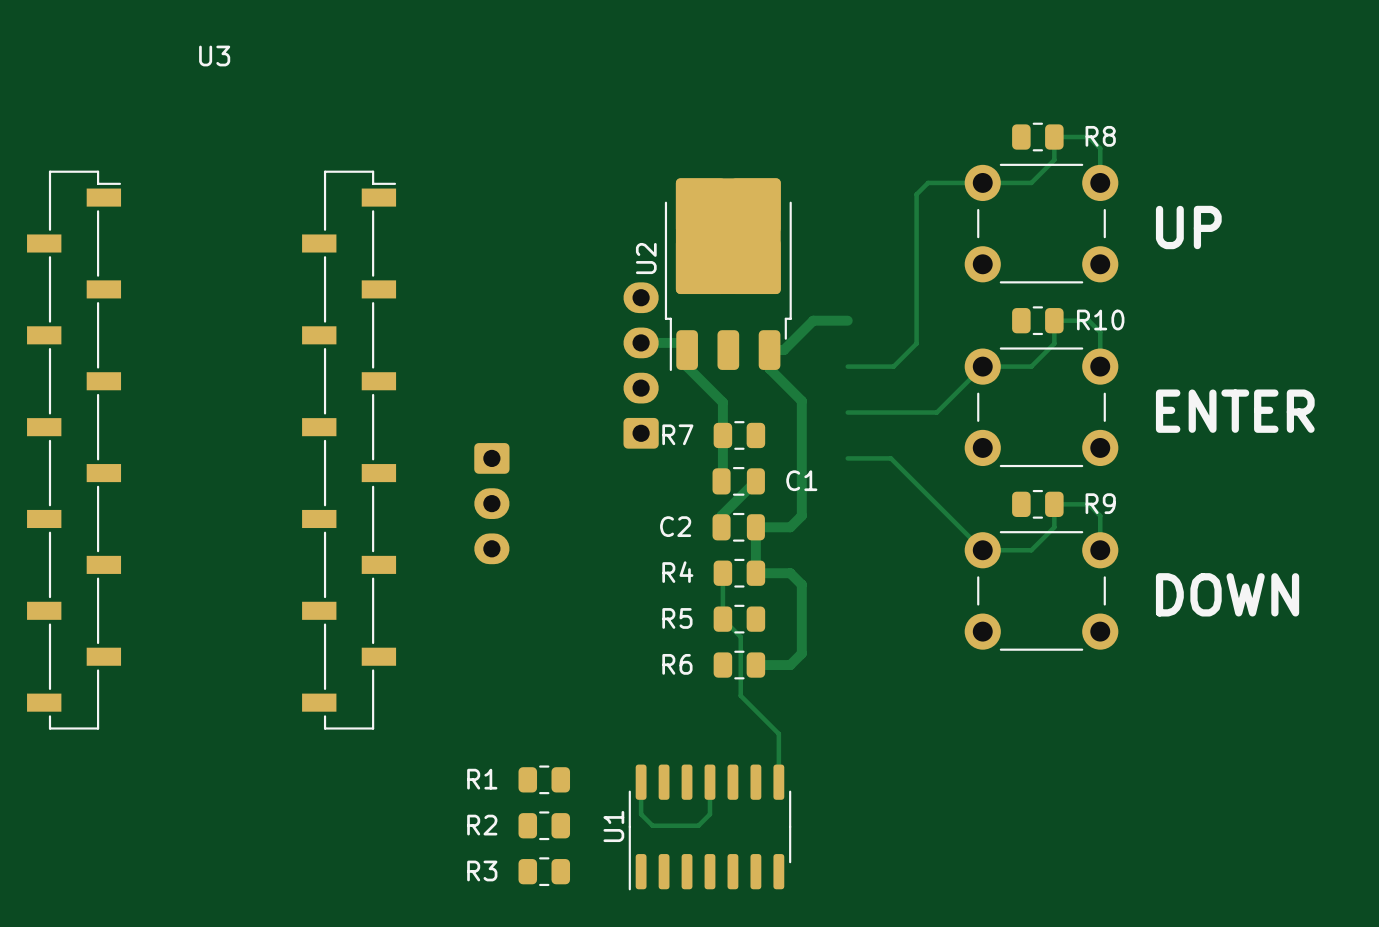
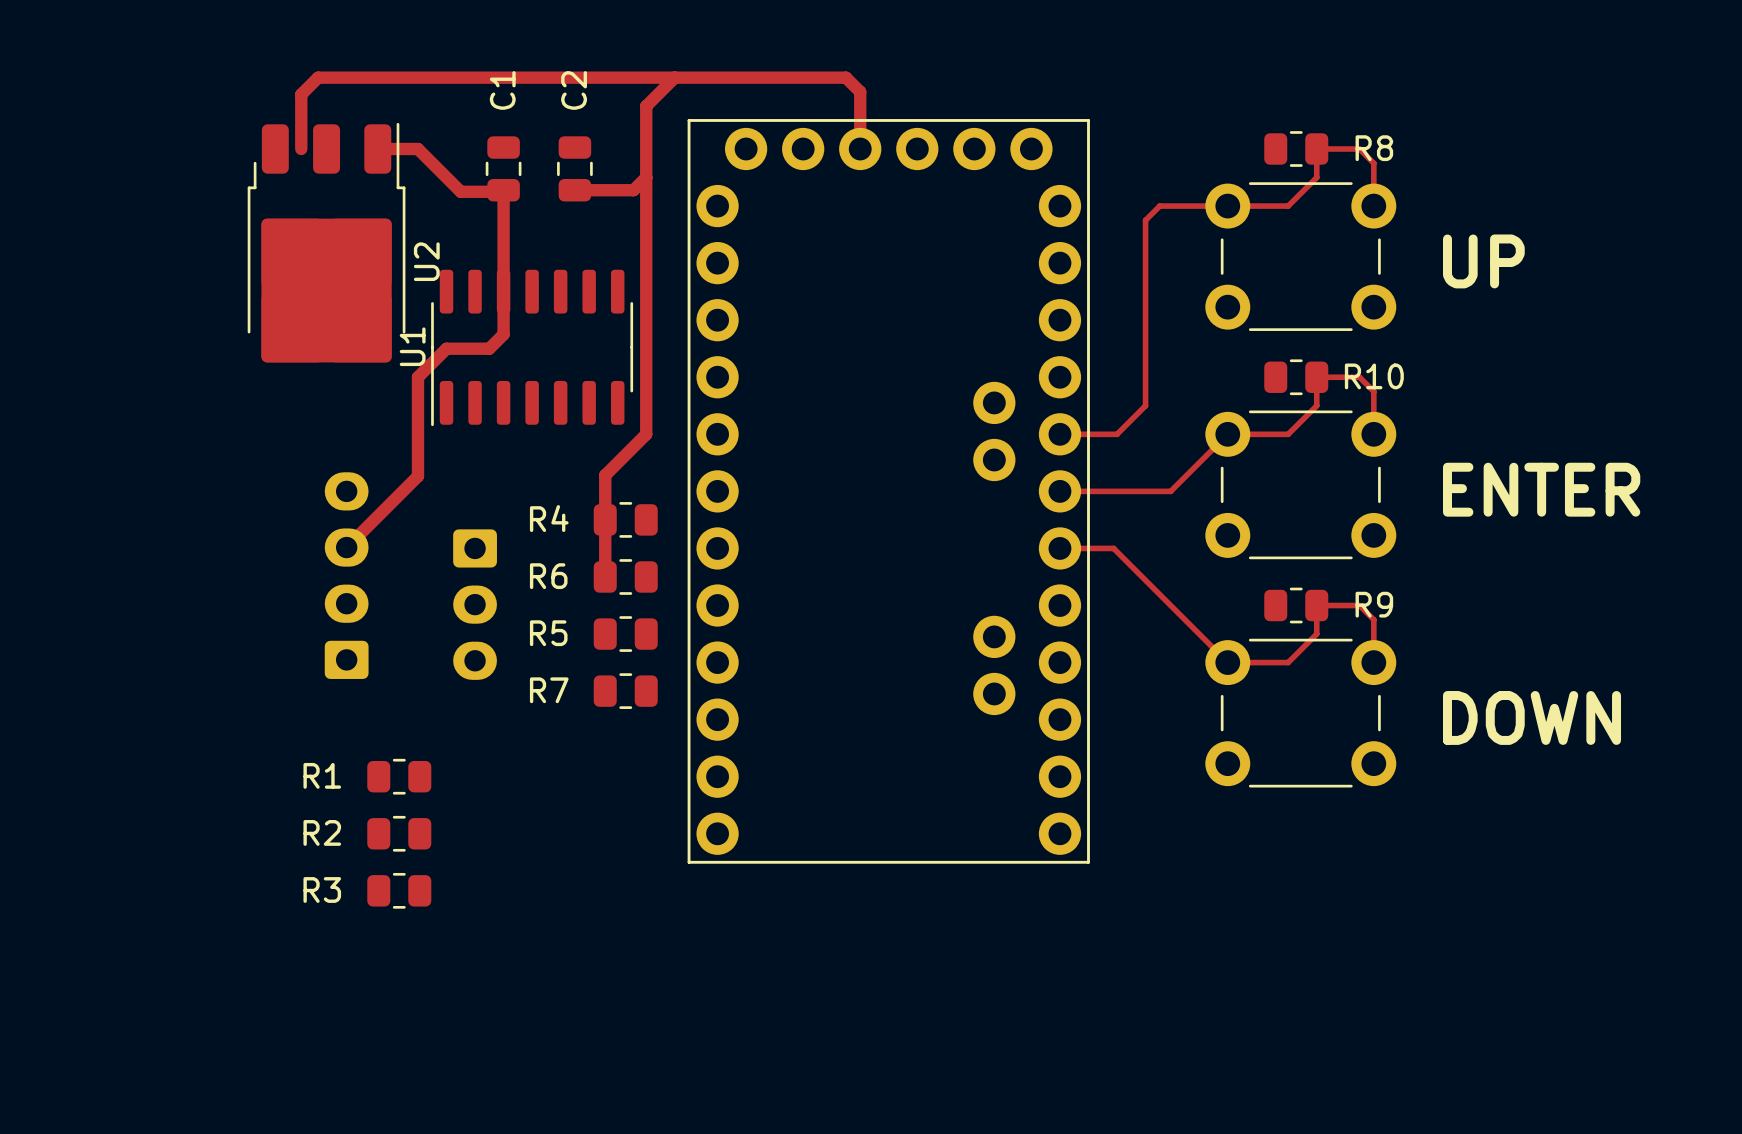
track: none -> (674, 77) (646, 106) (646, 434) (605, 475) (605, 576)
track: none -> (301, 149) (301, 94) (318, 77) (845, 77) (860, 91) (860, 149)
track: none -> (377, 149) (417, 149) (460, 191) (502, 191) (503, 190) (503, 334) (489, 348) (446, 348) (417, 377) (417, 476) (346, 547)
track: none -> (646, 177) (633, 190) (574, 190)
U2 rotation: 0° (728, 274) -> 180° (326, 242)
U2 position: (728, 274) -> (326, 242)
track: (847, 320) (813, 320) (783, 350) (769, 350) (769, 368) (801, 401) (801, 515) (790, 527) (755, 527) (755, 573) (790, 573) (801, 584) (801, 653) (790, 665) (755, 665) -> none
track: (641, 342) (679, 342) (687, 350) (687, 366) (722, 402) (721, 481) -> none
part position: (641, 365) -> (346, 575)
part: none -> (888, 491)
R7 position: (739, 435) -> (625, 691)
U3: (211, 450) -> none
C1 name position: C1 (801, 480) -> C1 (502, 90)
C1 rotation: 0° (738, 481) -> 90° clockwise (503, 168)
C1 position: (738, 481) -> (503, 168)
track: (755, 481) (721, 515) (721, 527) -> none
part position: (491, 503) -> (475, 604)
C2 rotation: 0° (738, 527) -> 90° clockwise (574, 168)
C2 position: (738, 527) -> (574, 168)
track: (722, 573) (722, 619) (740, 636) (740, 695) (778, 733) (778, 782) -> none
R4 position: (739, 573) -> (625, 519)
R5 position: (739, 619) -> (625, 634)
R6 position: (739, 665) -> (625, 576)
R1 position: (544, 779) -> (399, 776)
track: (641, 782) (641, 814) (652, 825) (698, 825) (709, 814) (709, 782) -> none
R2 position: (544, 825) -> (399, 833)
U1 position: (709, 827) -> (532, 347)
R3 position: (544, 871) -> (399, 890)

